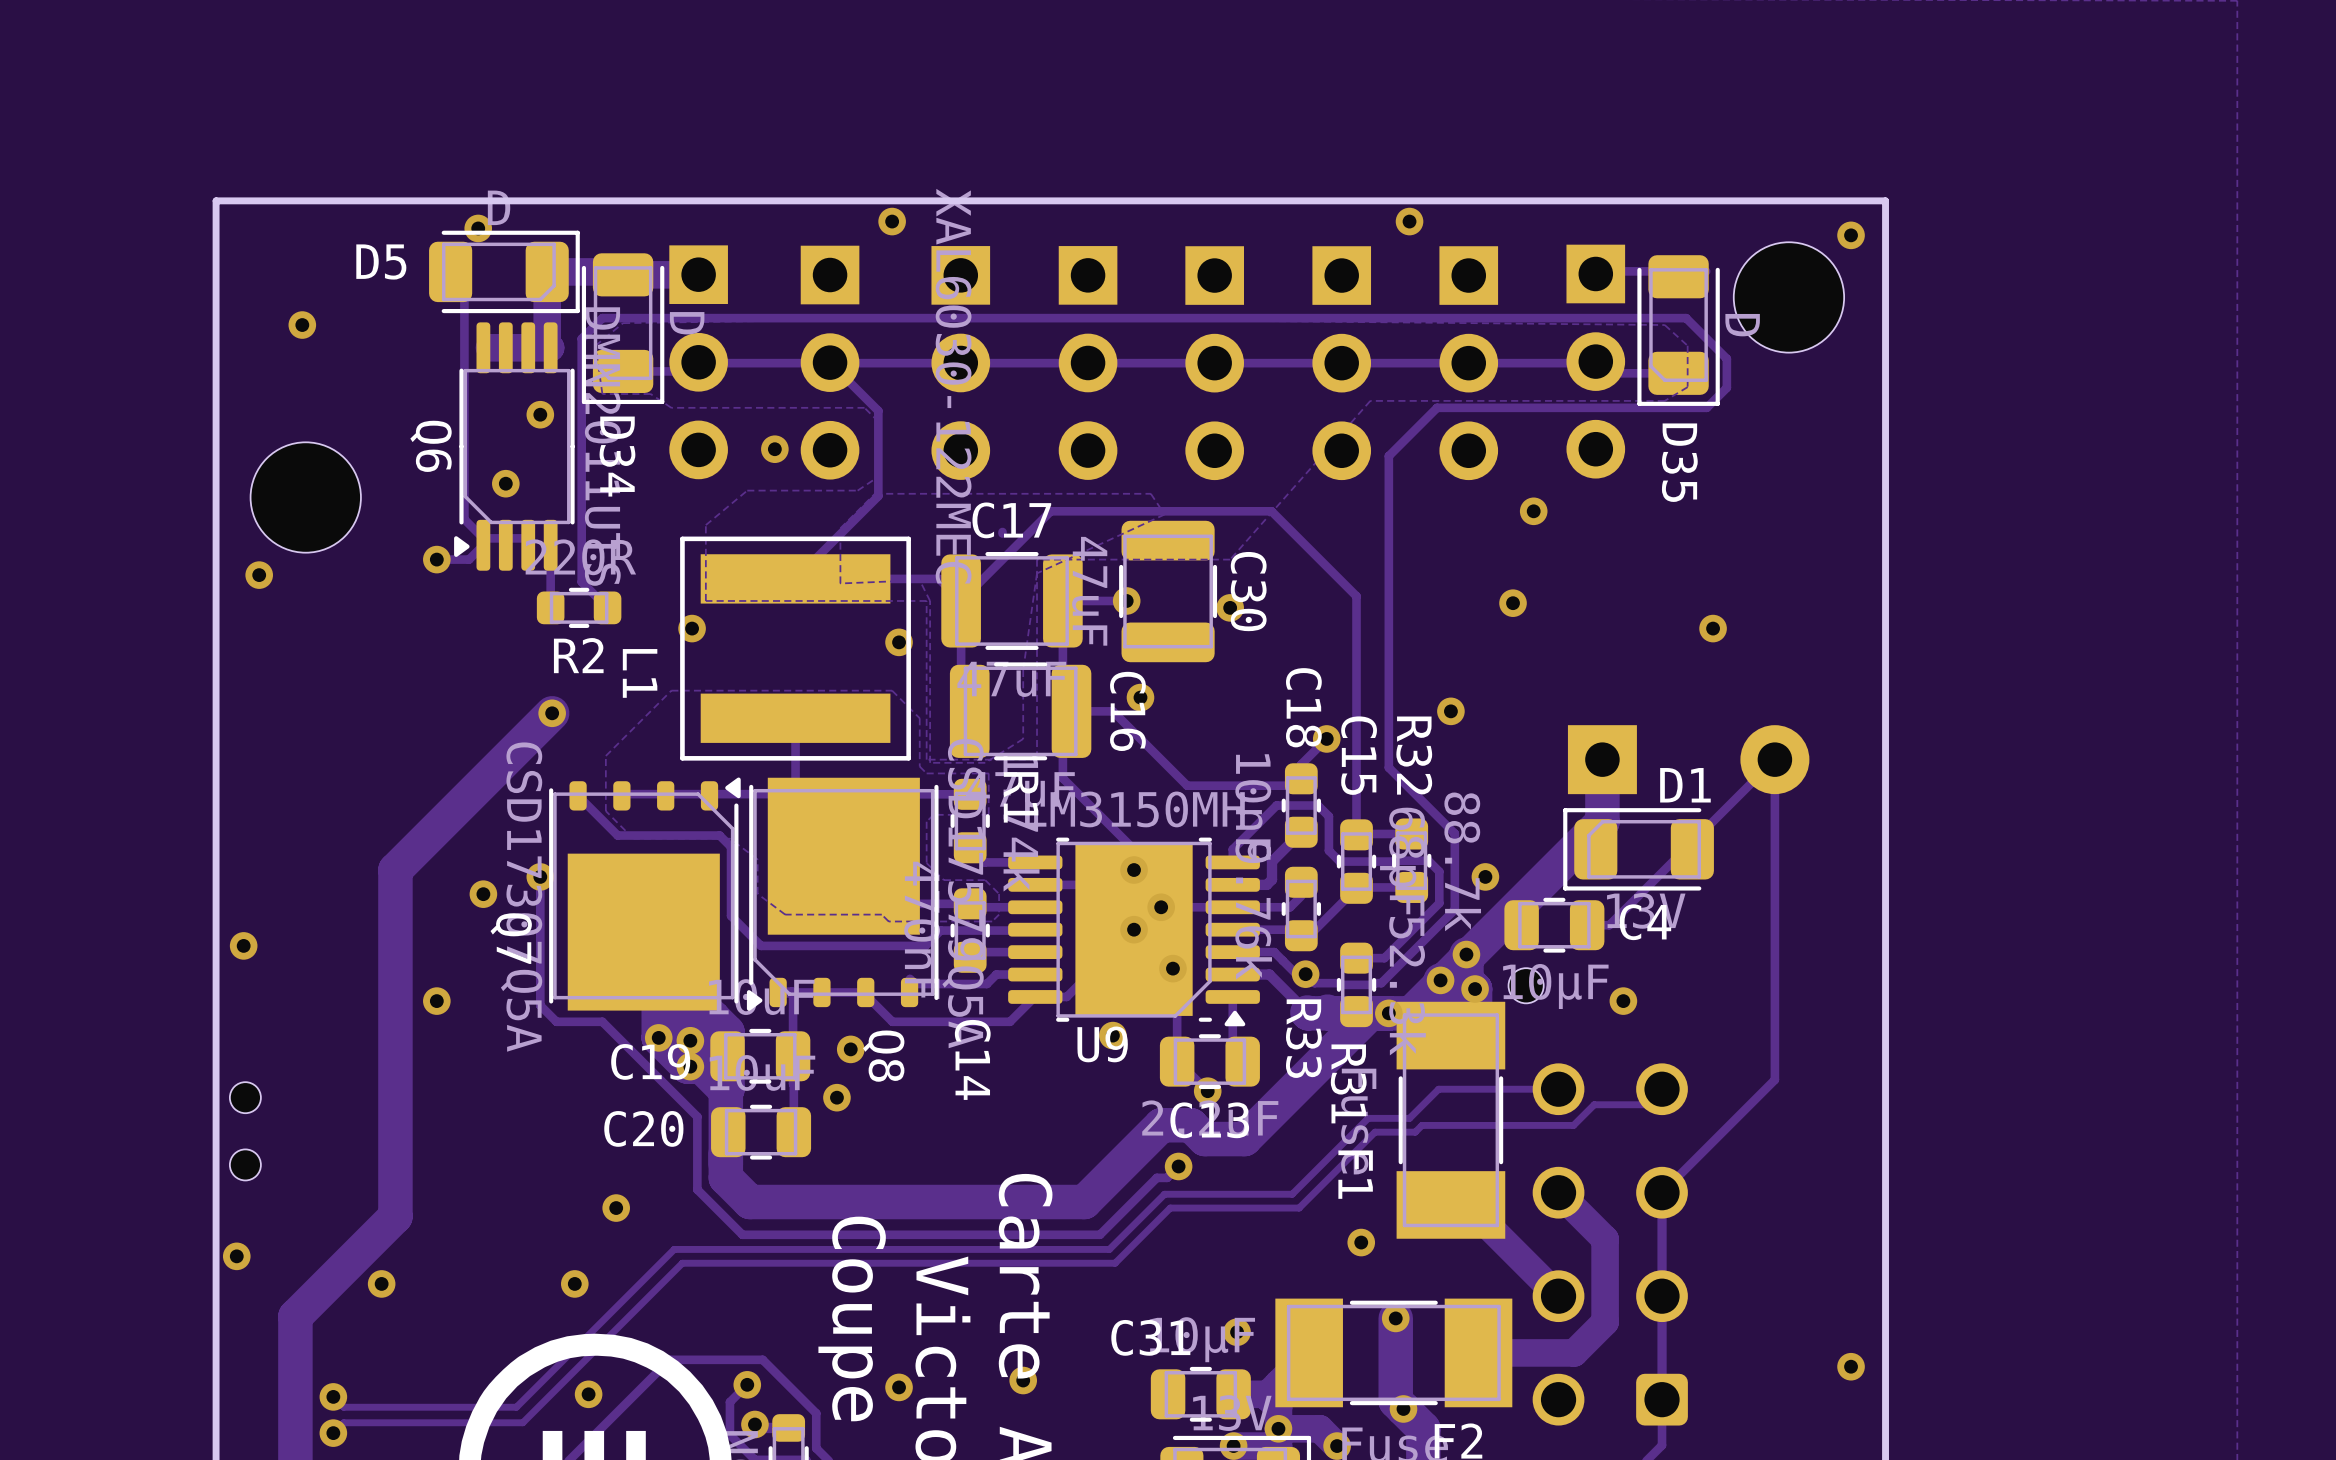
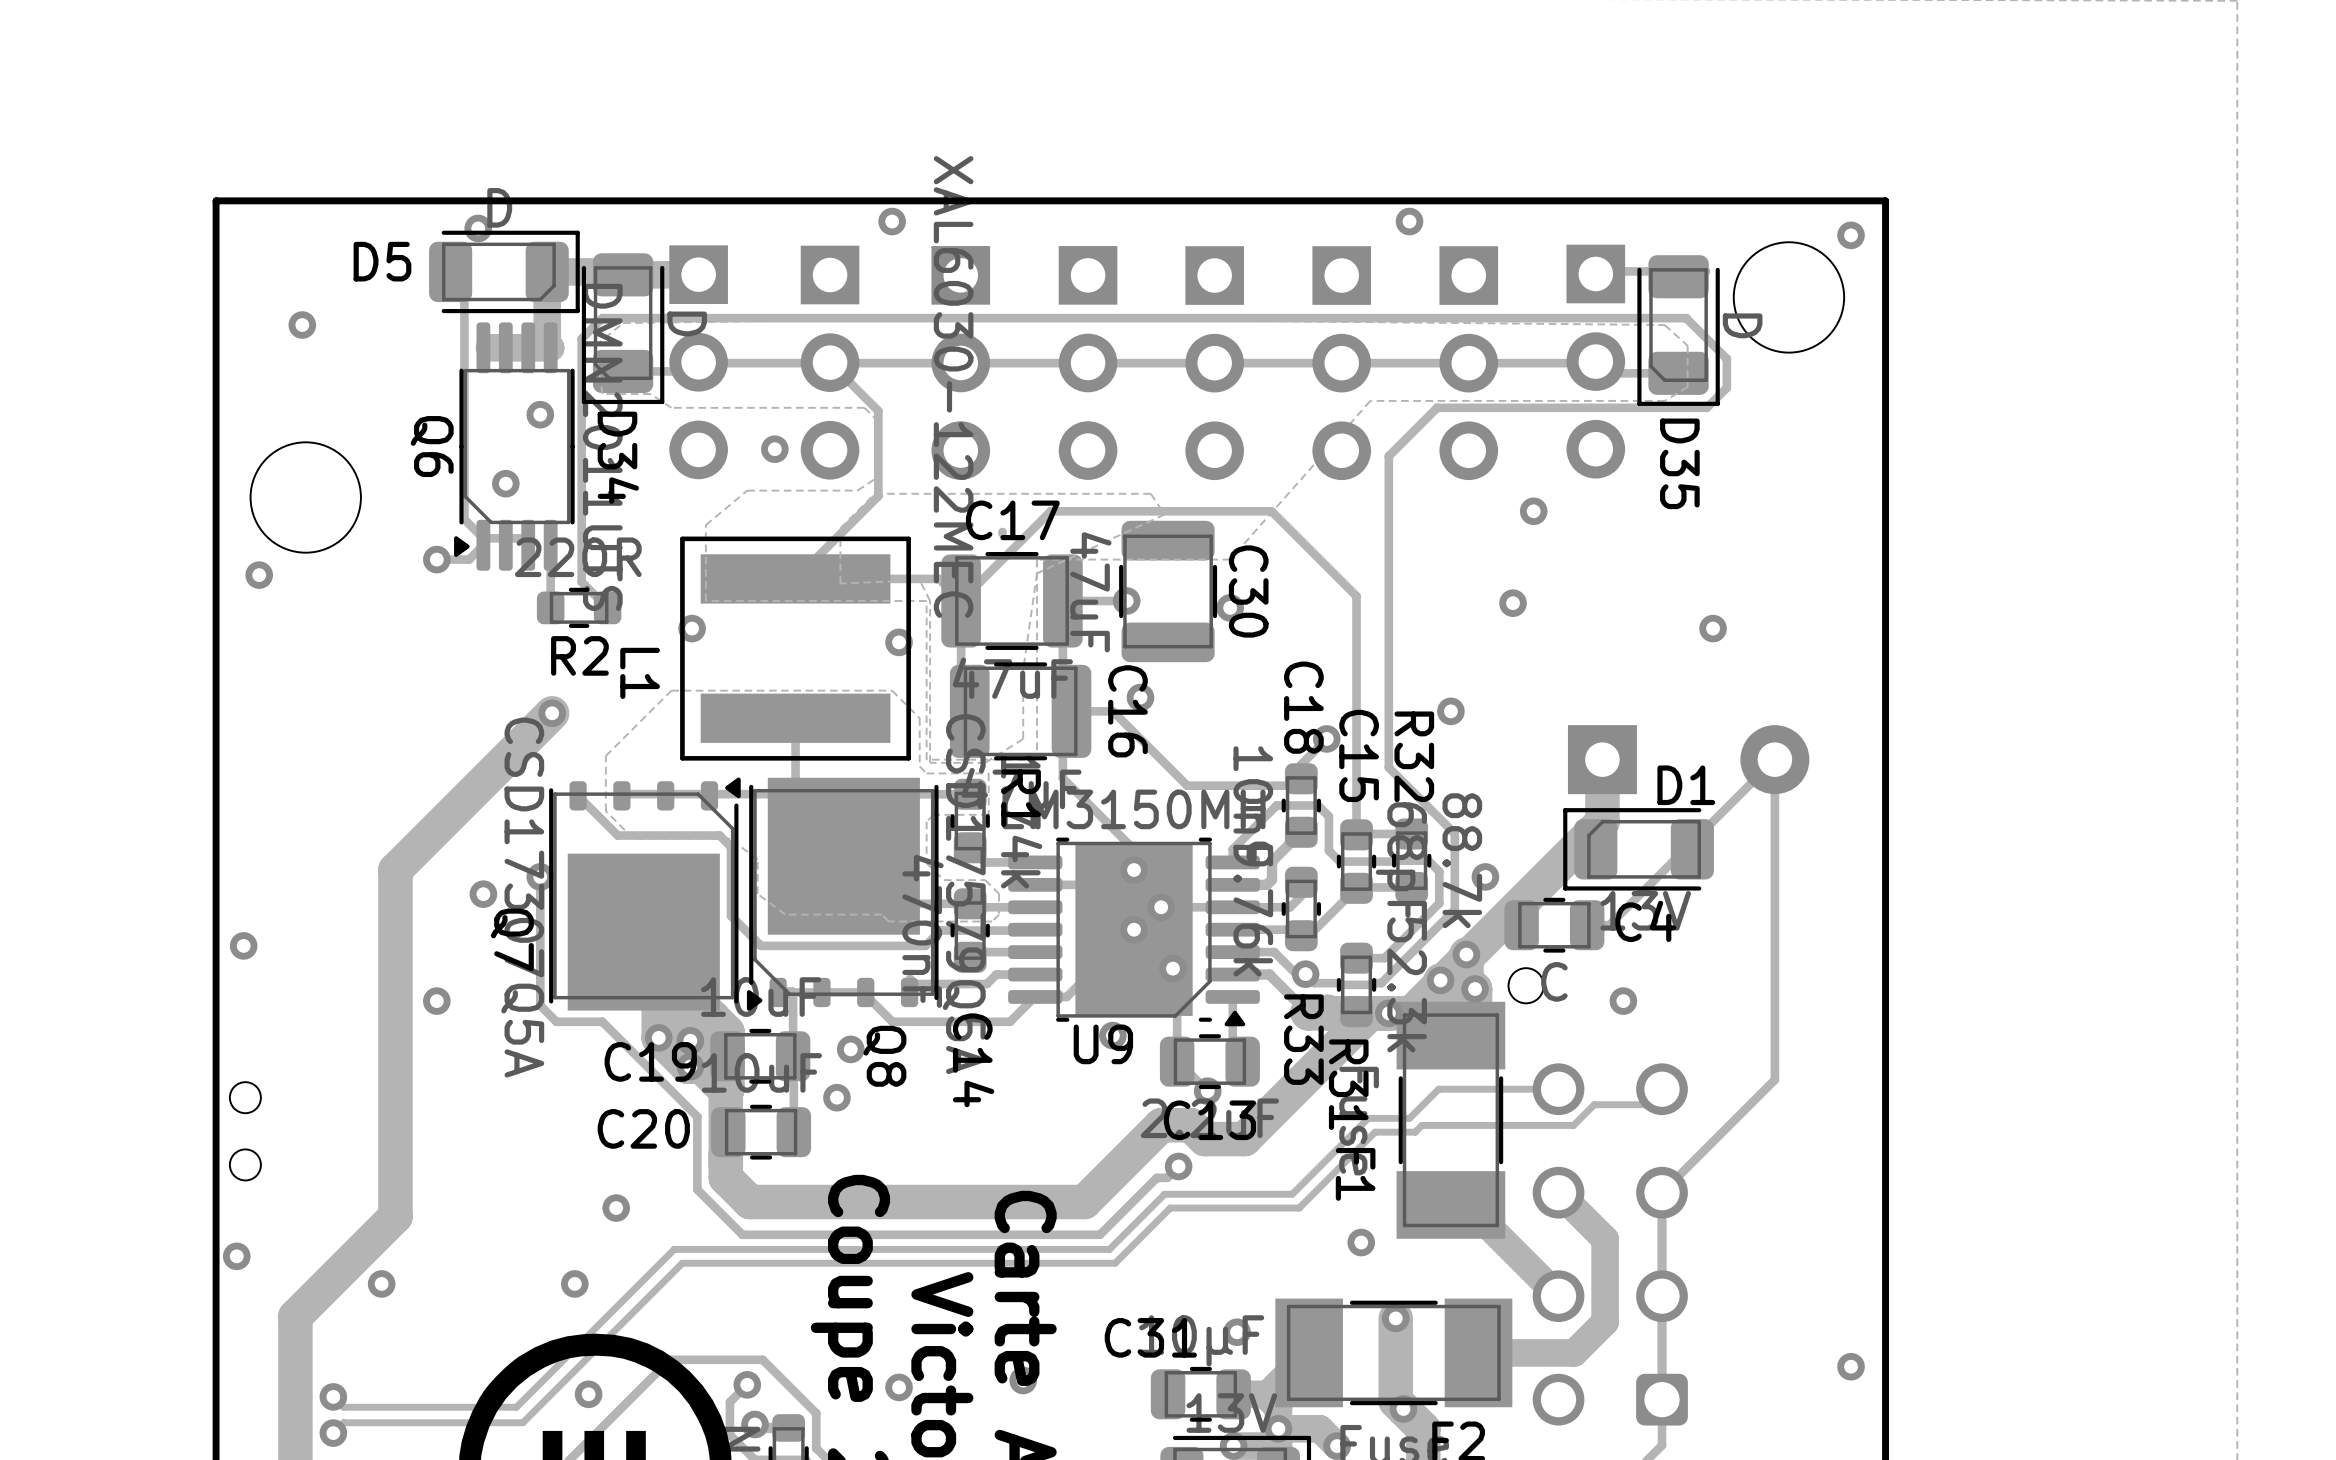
C4 value: 10µF (1555, 986) -> C (1554, 981)

